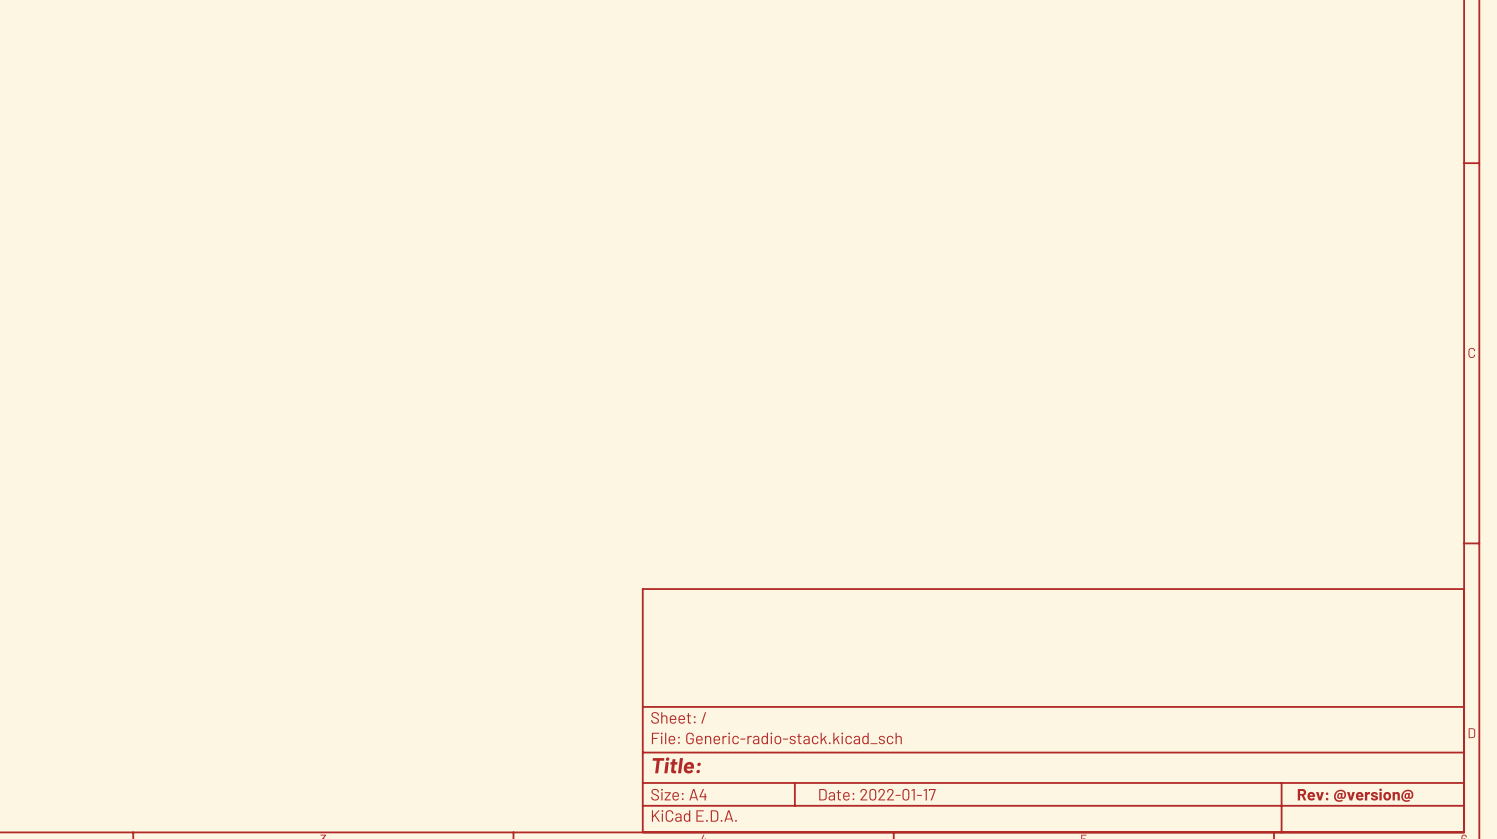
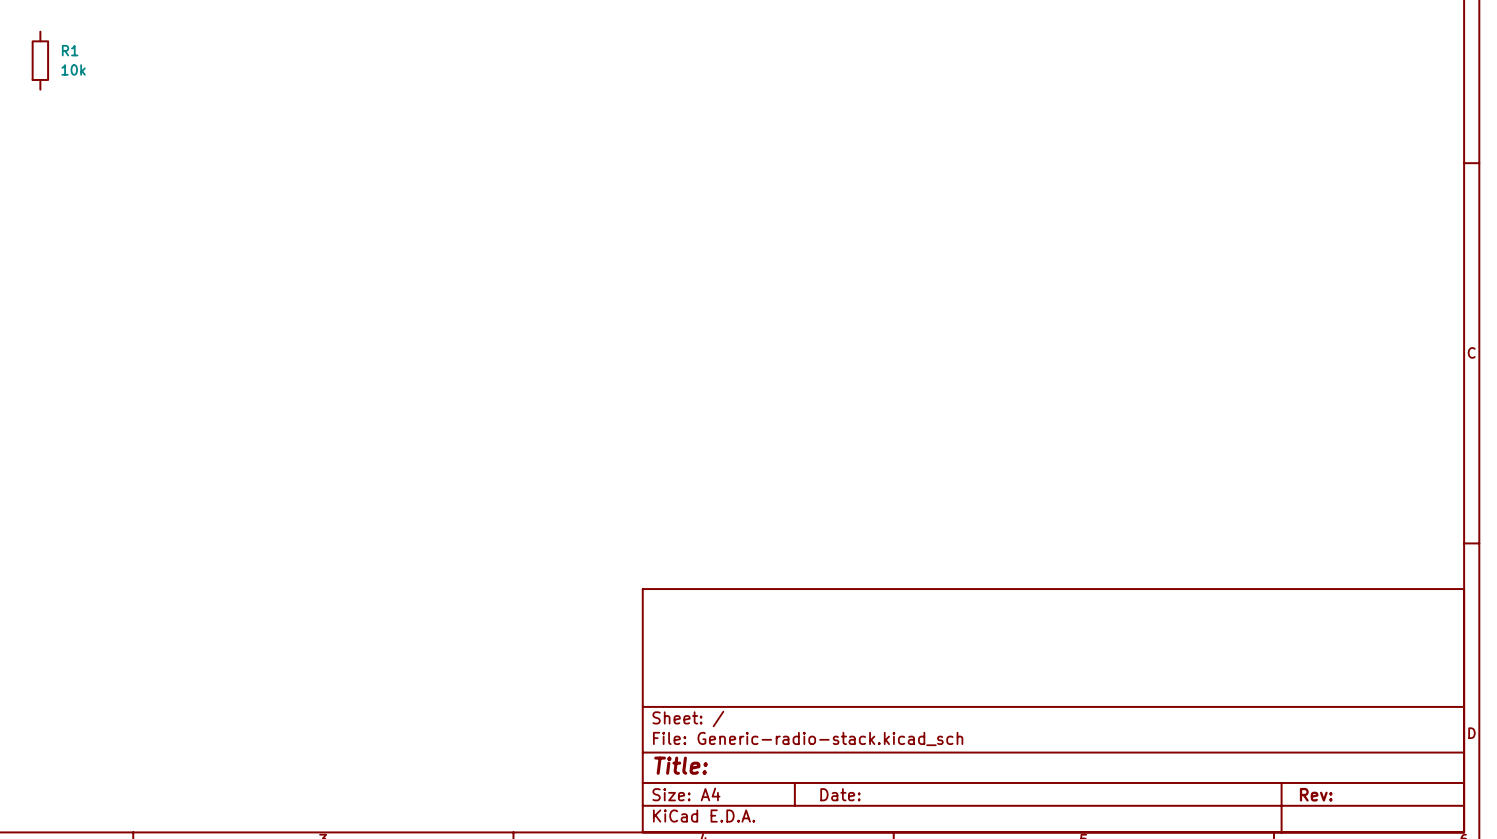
R1: none -> 10k (40, 60)
title block: Date: 2022-01-17 (877, 794) -> Date: (840, 794)
title block: Rev: @version@ (1355, 795) -> Rev: (1316, 794)

